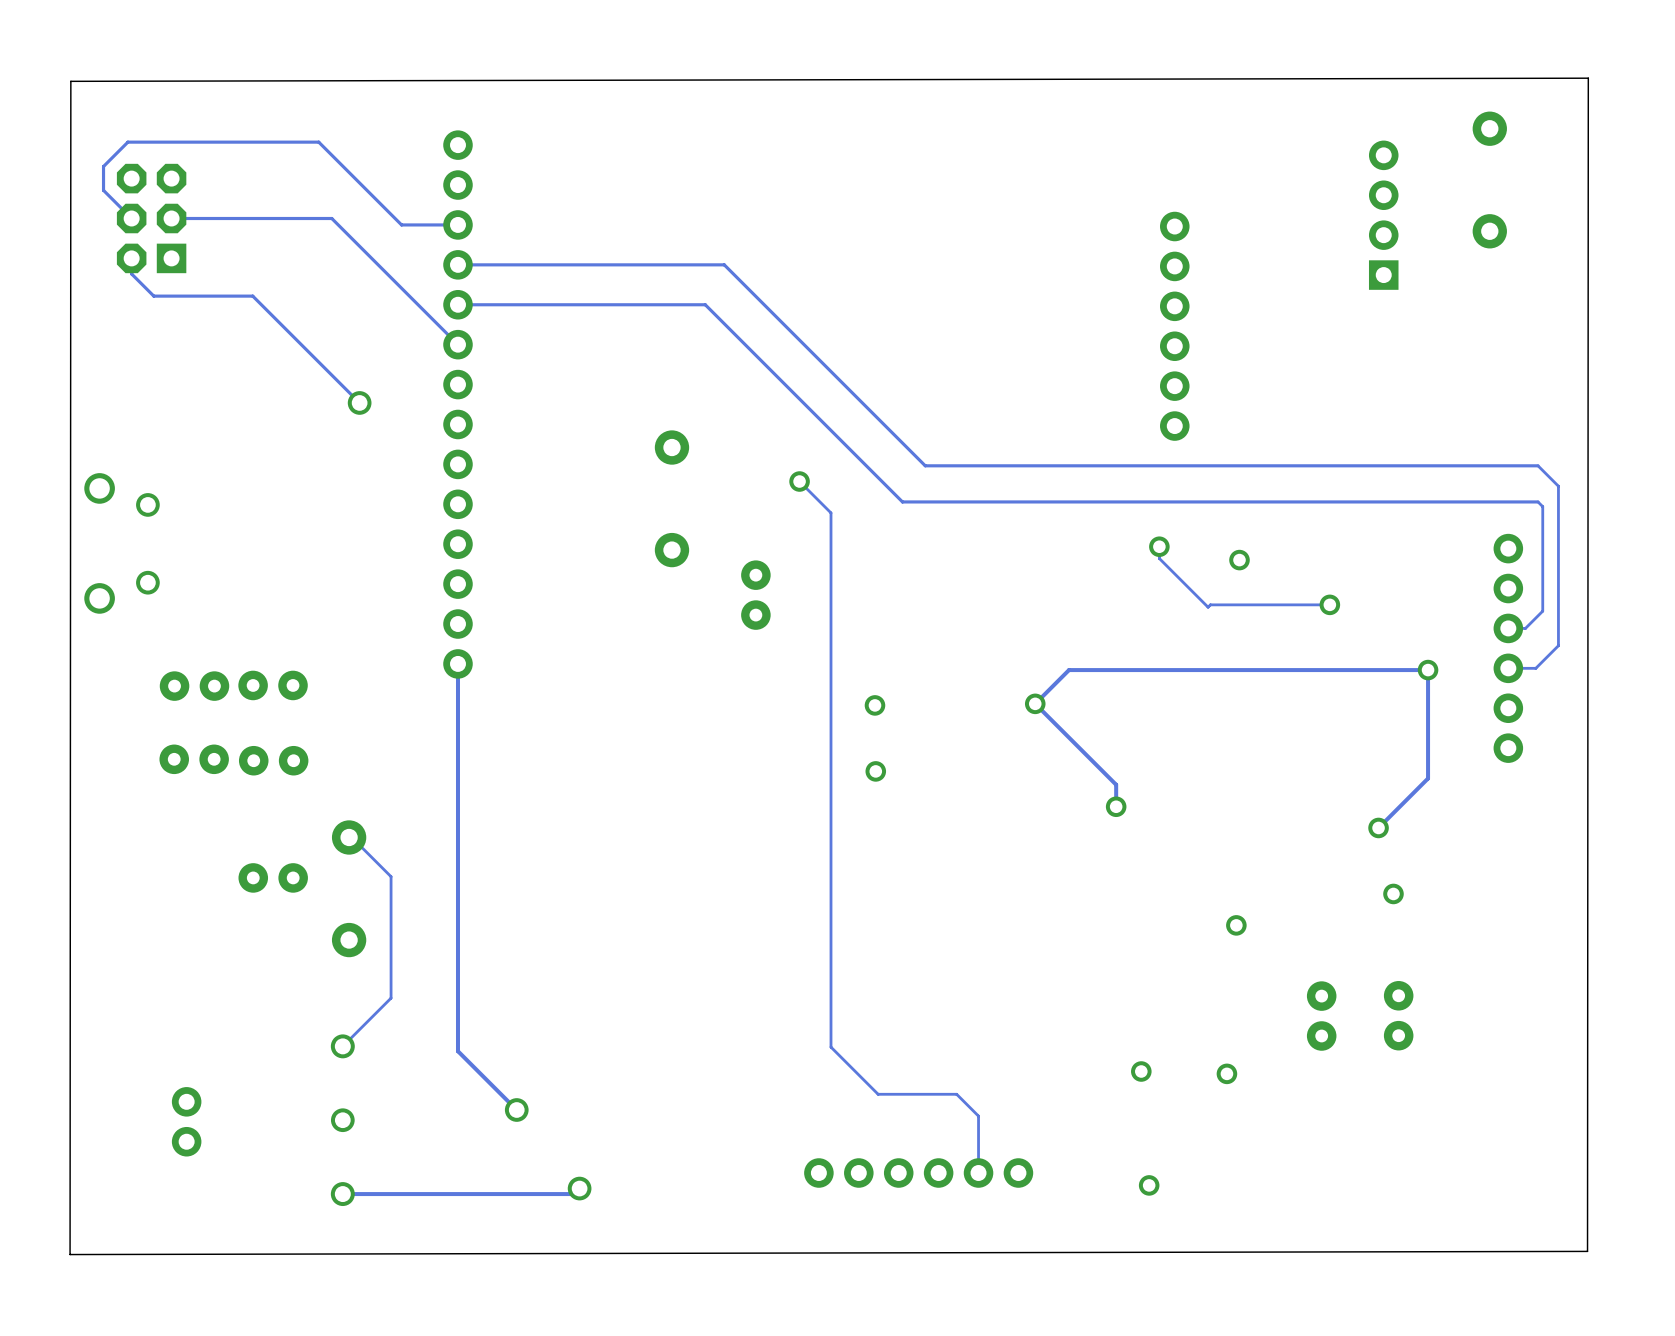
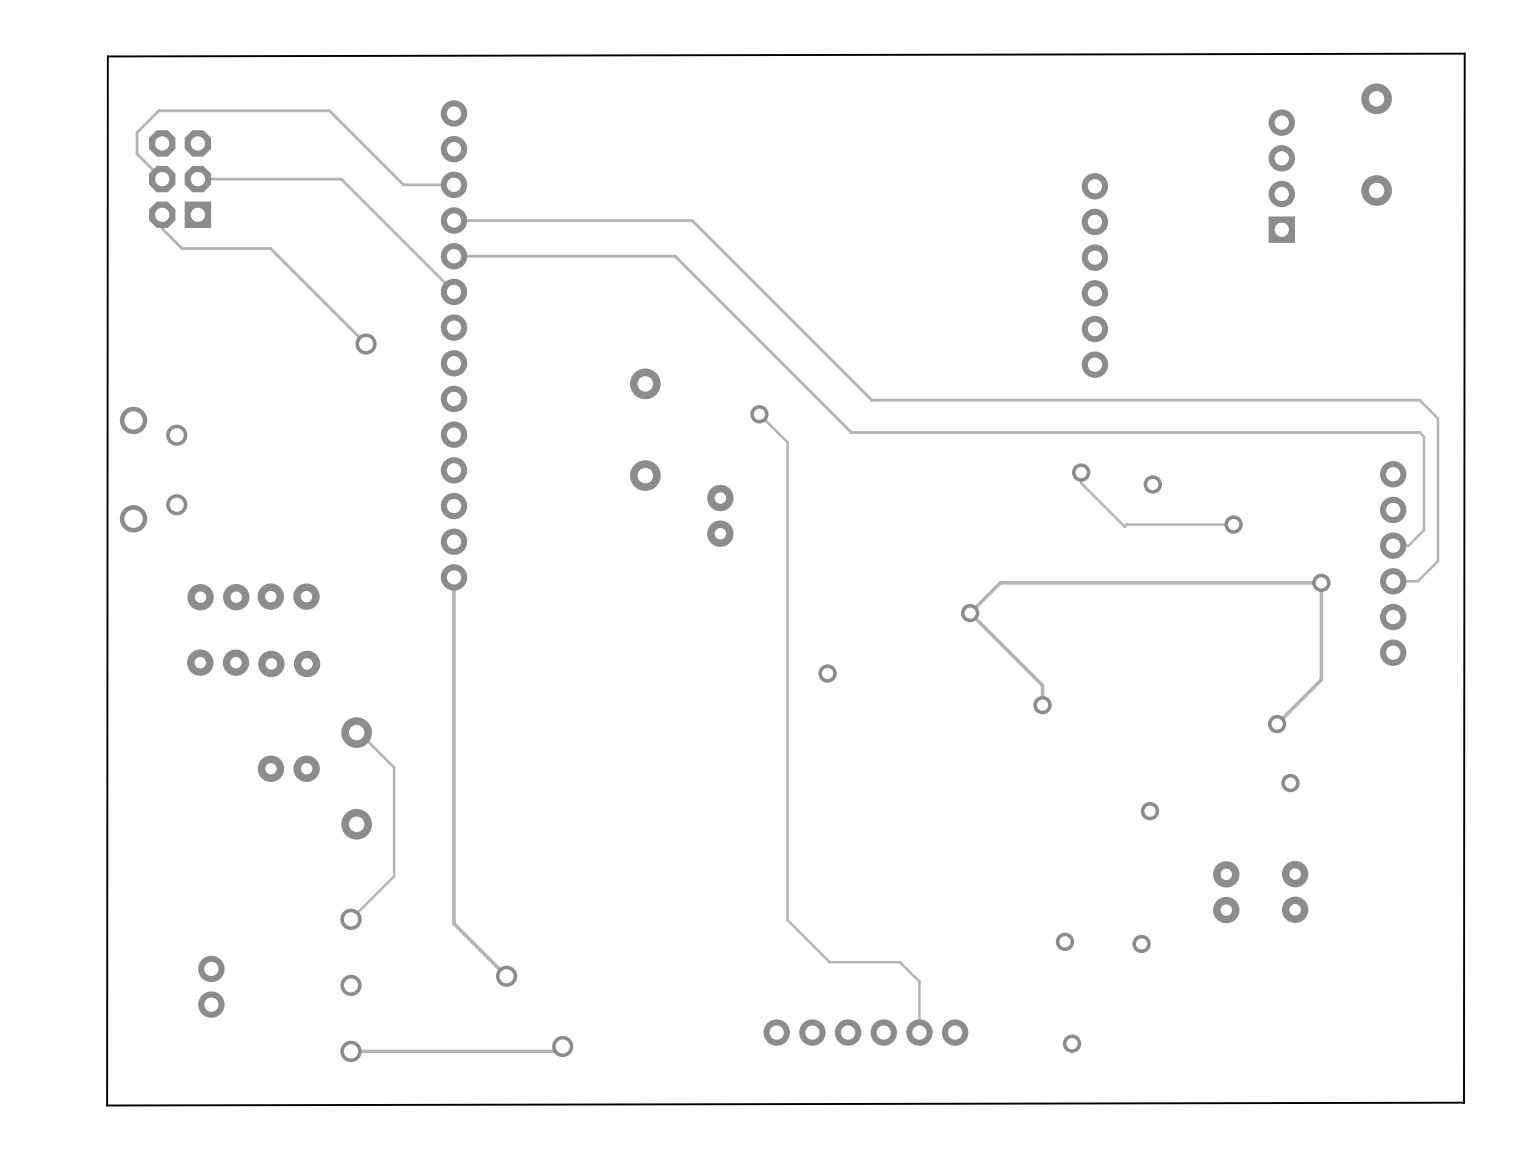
via: (874, 705) -> none

